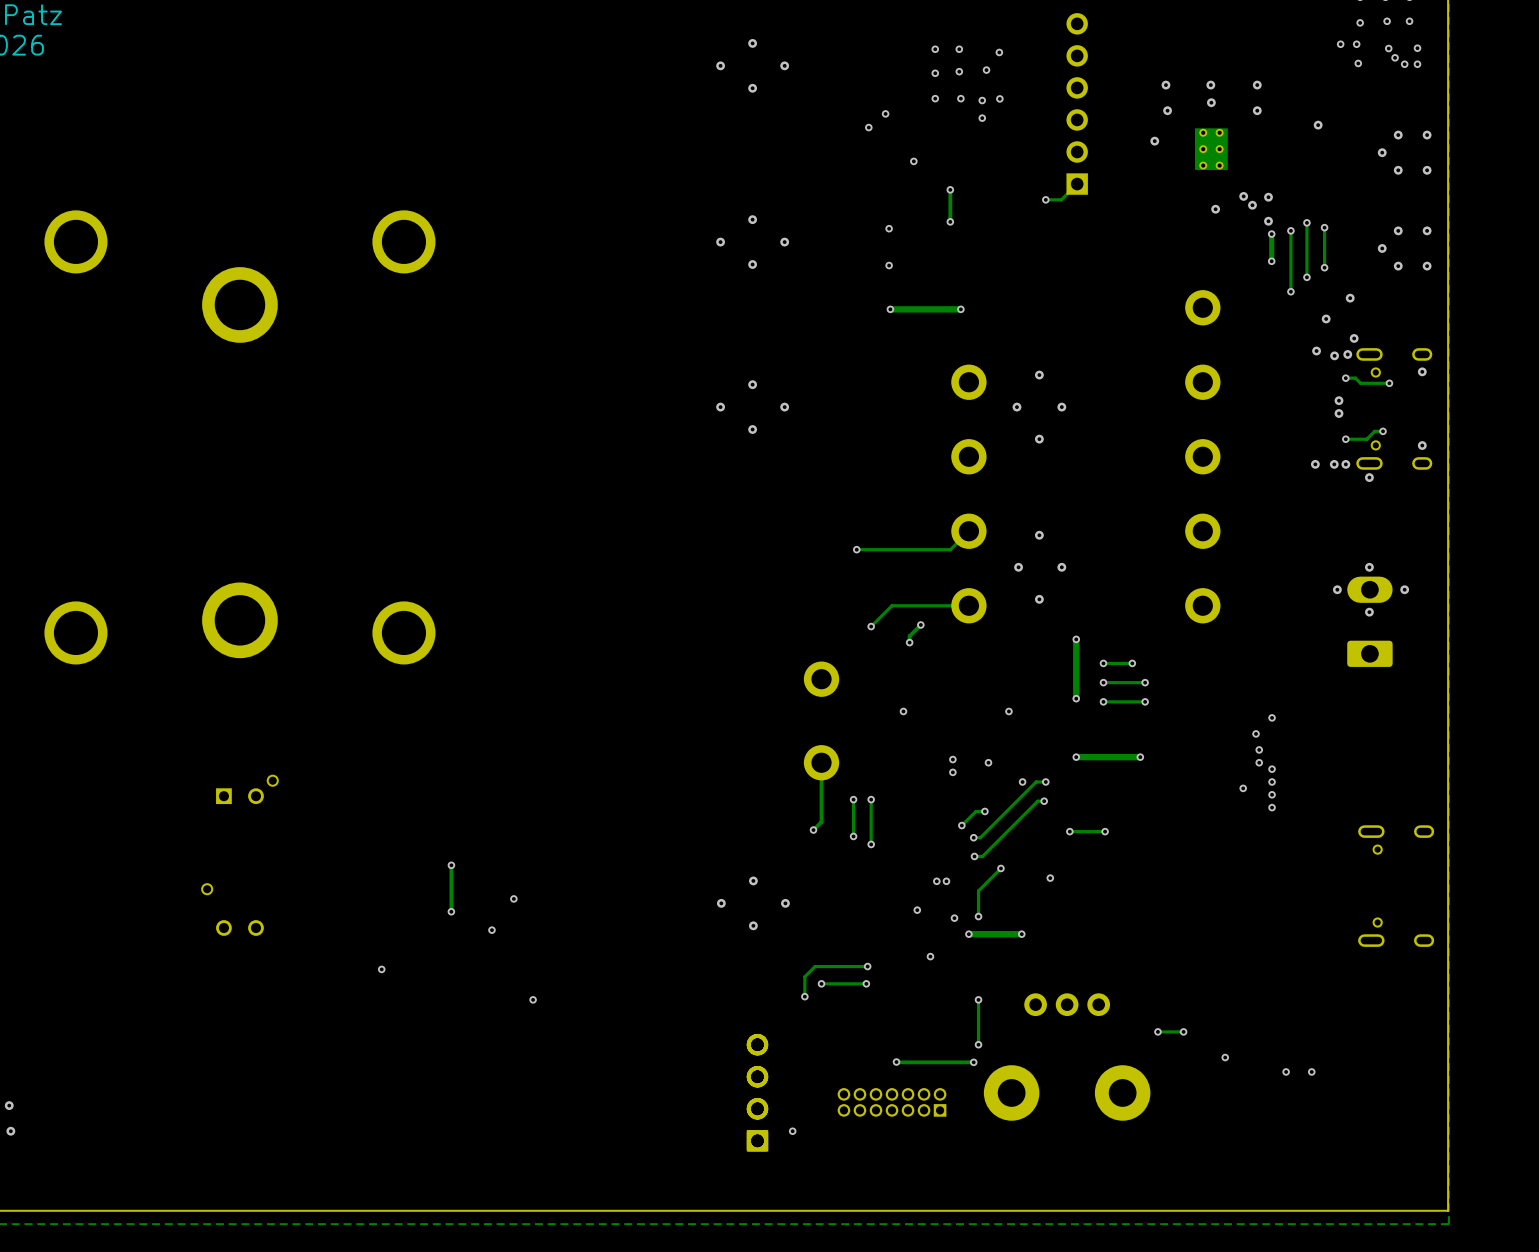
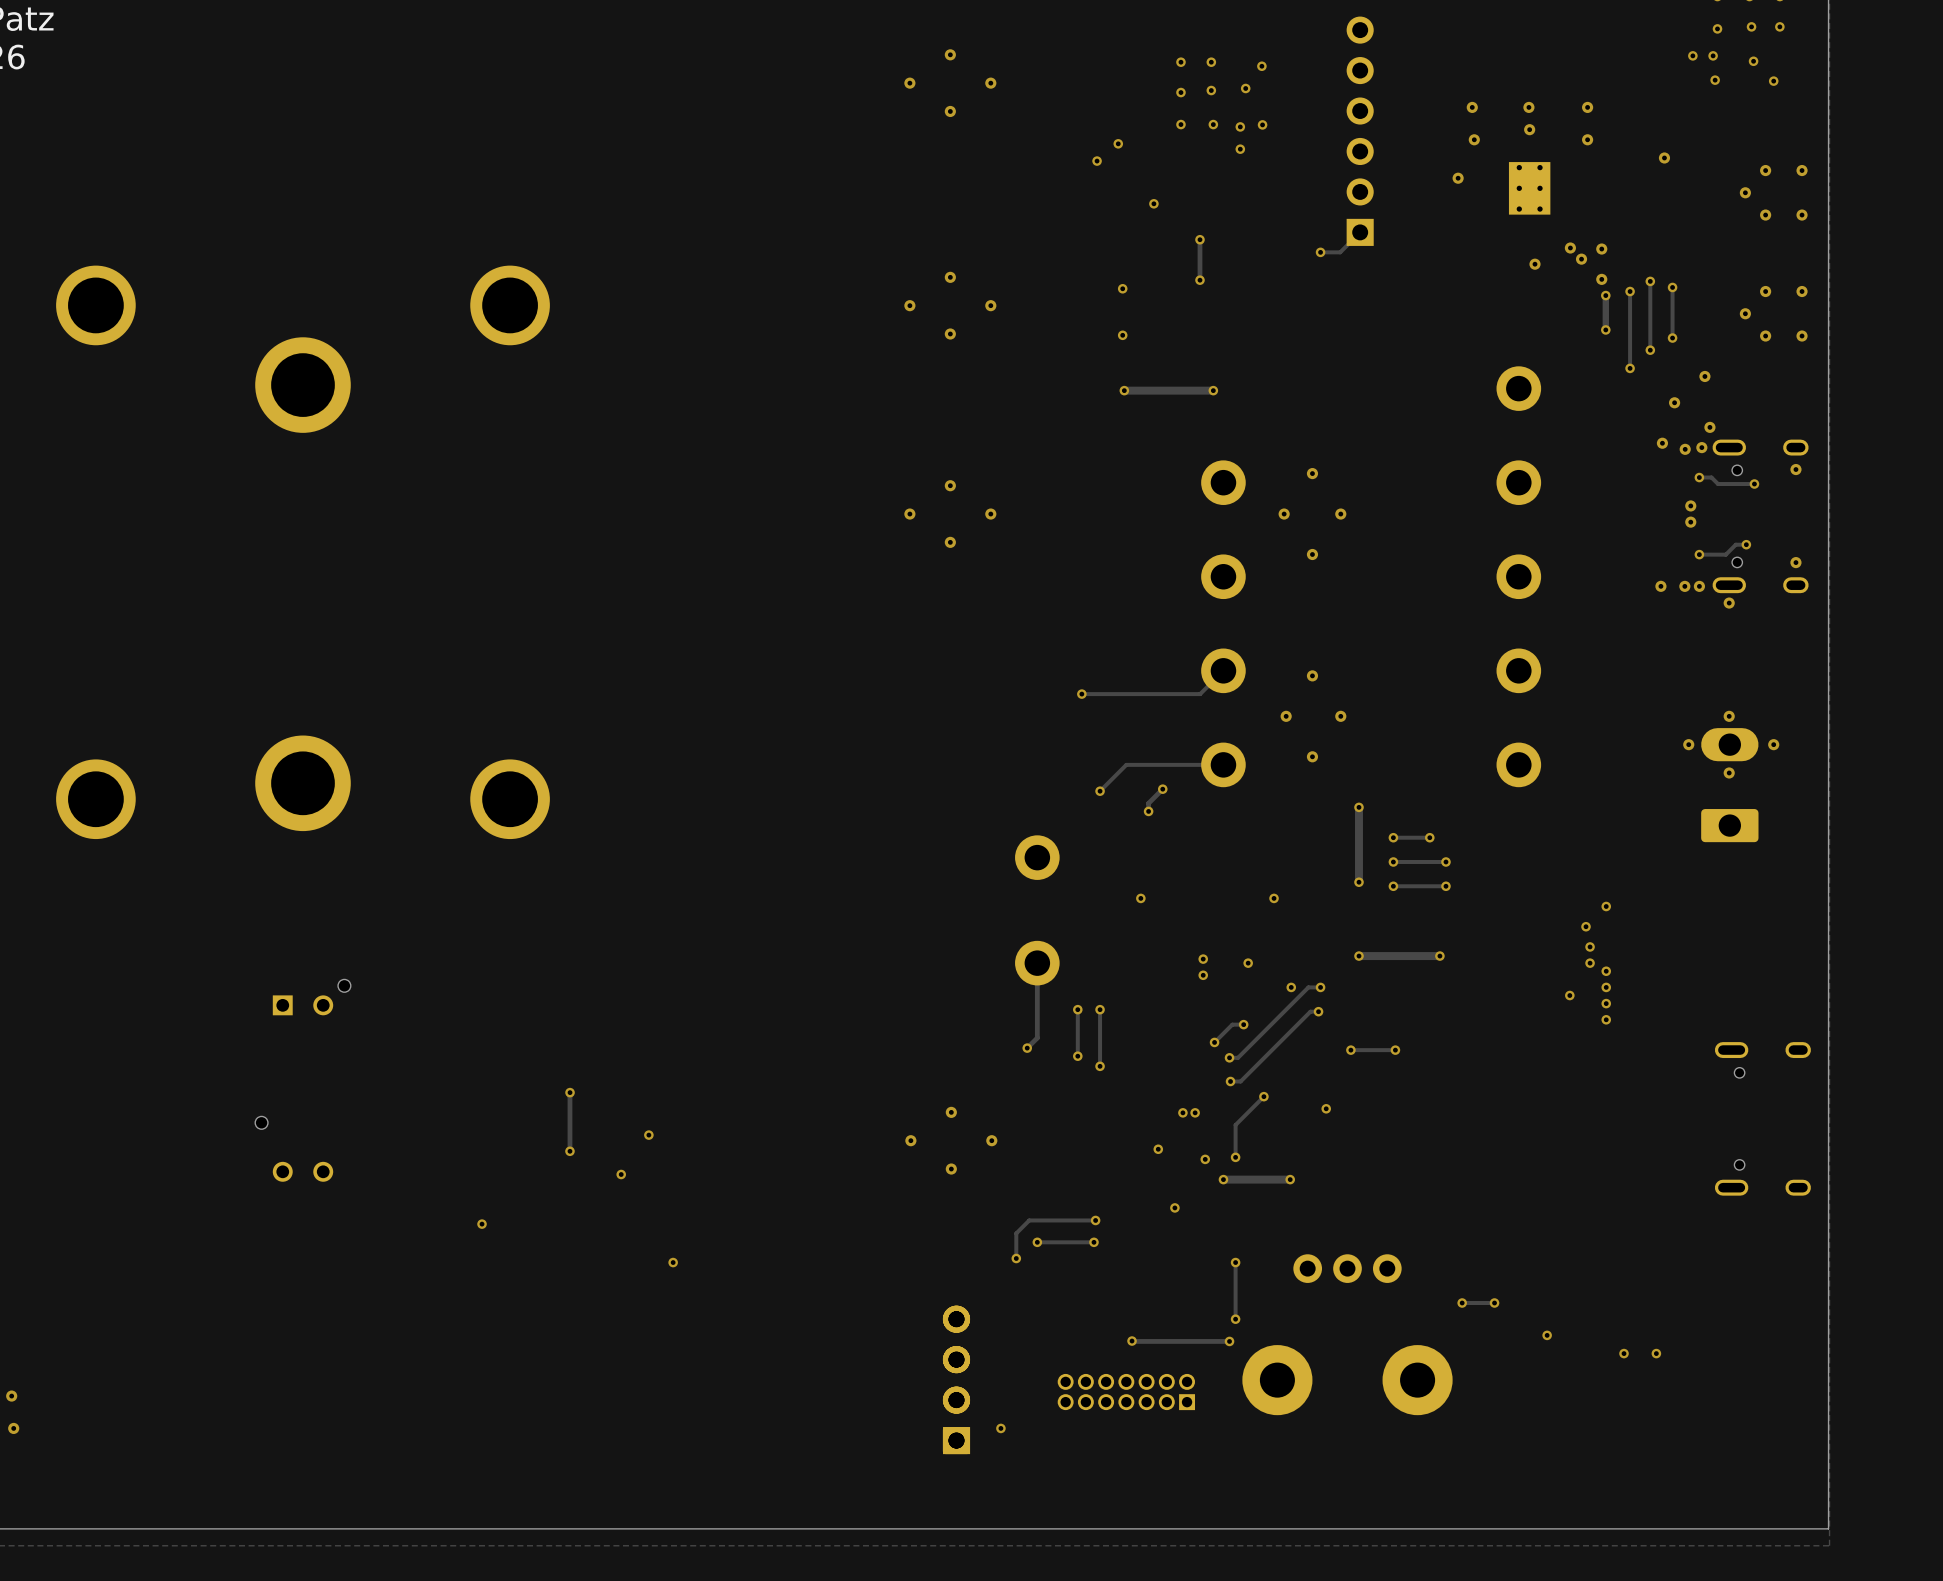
via: (1417, 48) -> none
via: (1395, 57) -> none
via: (1417, 64) -> none

